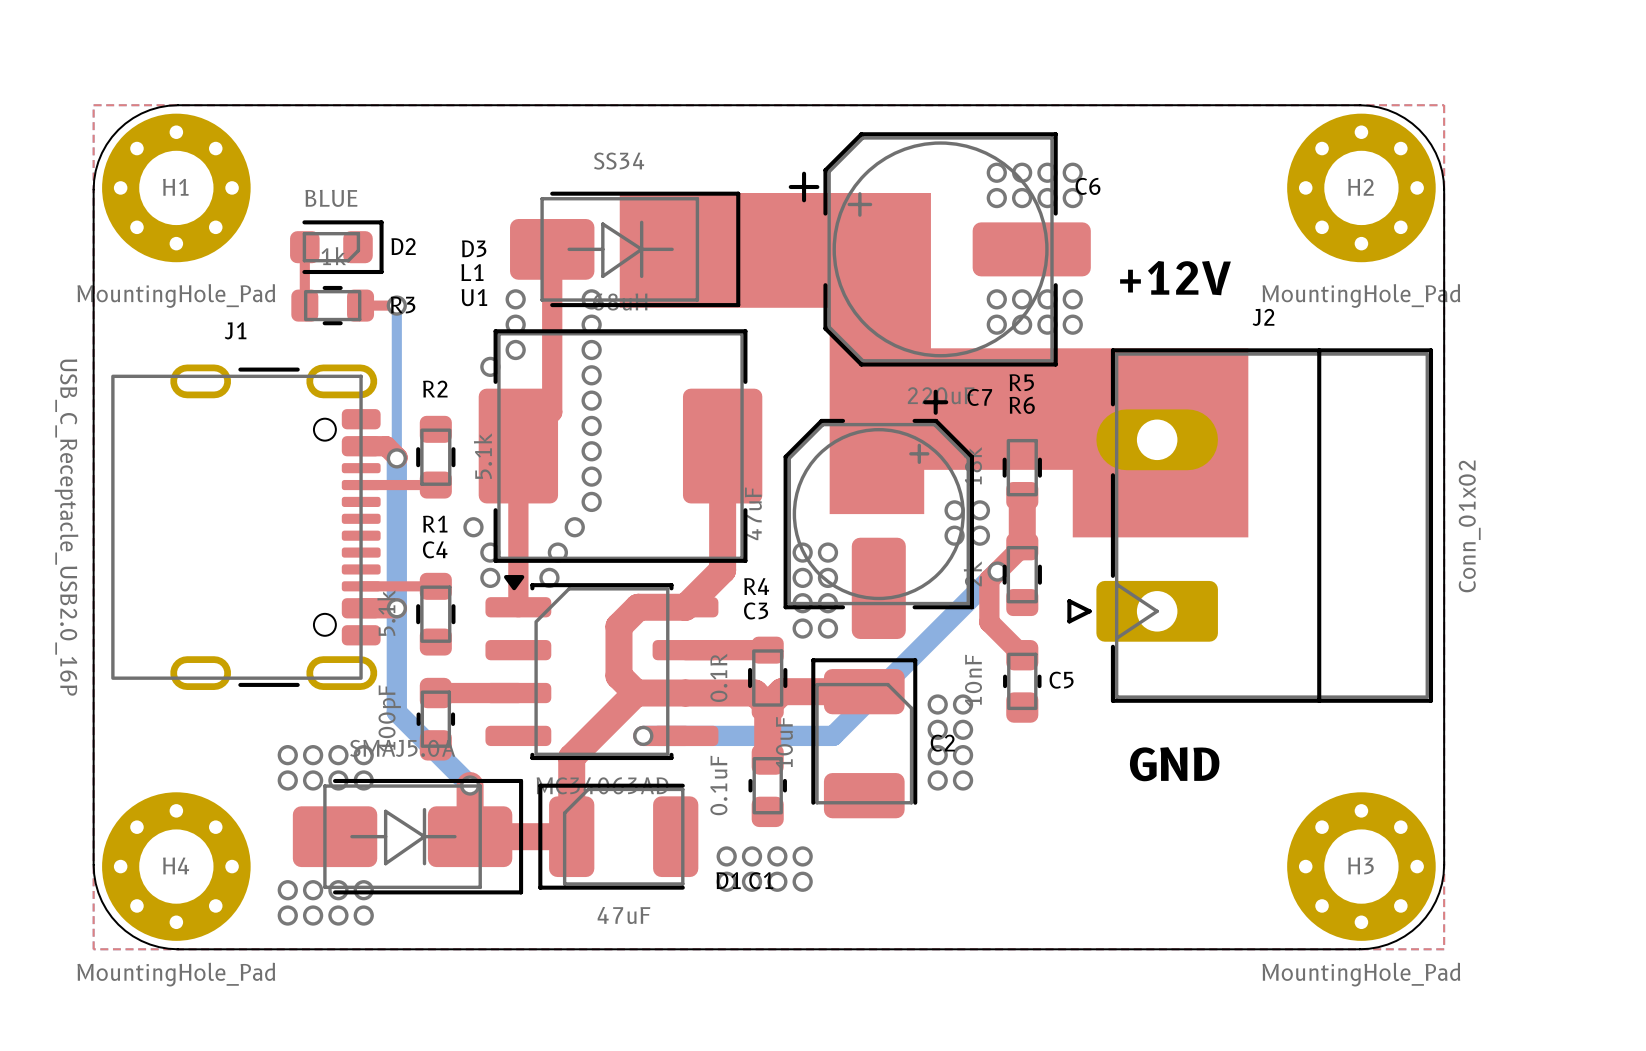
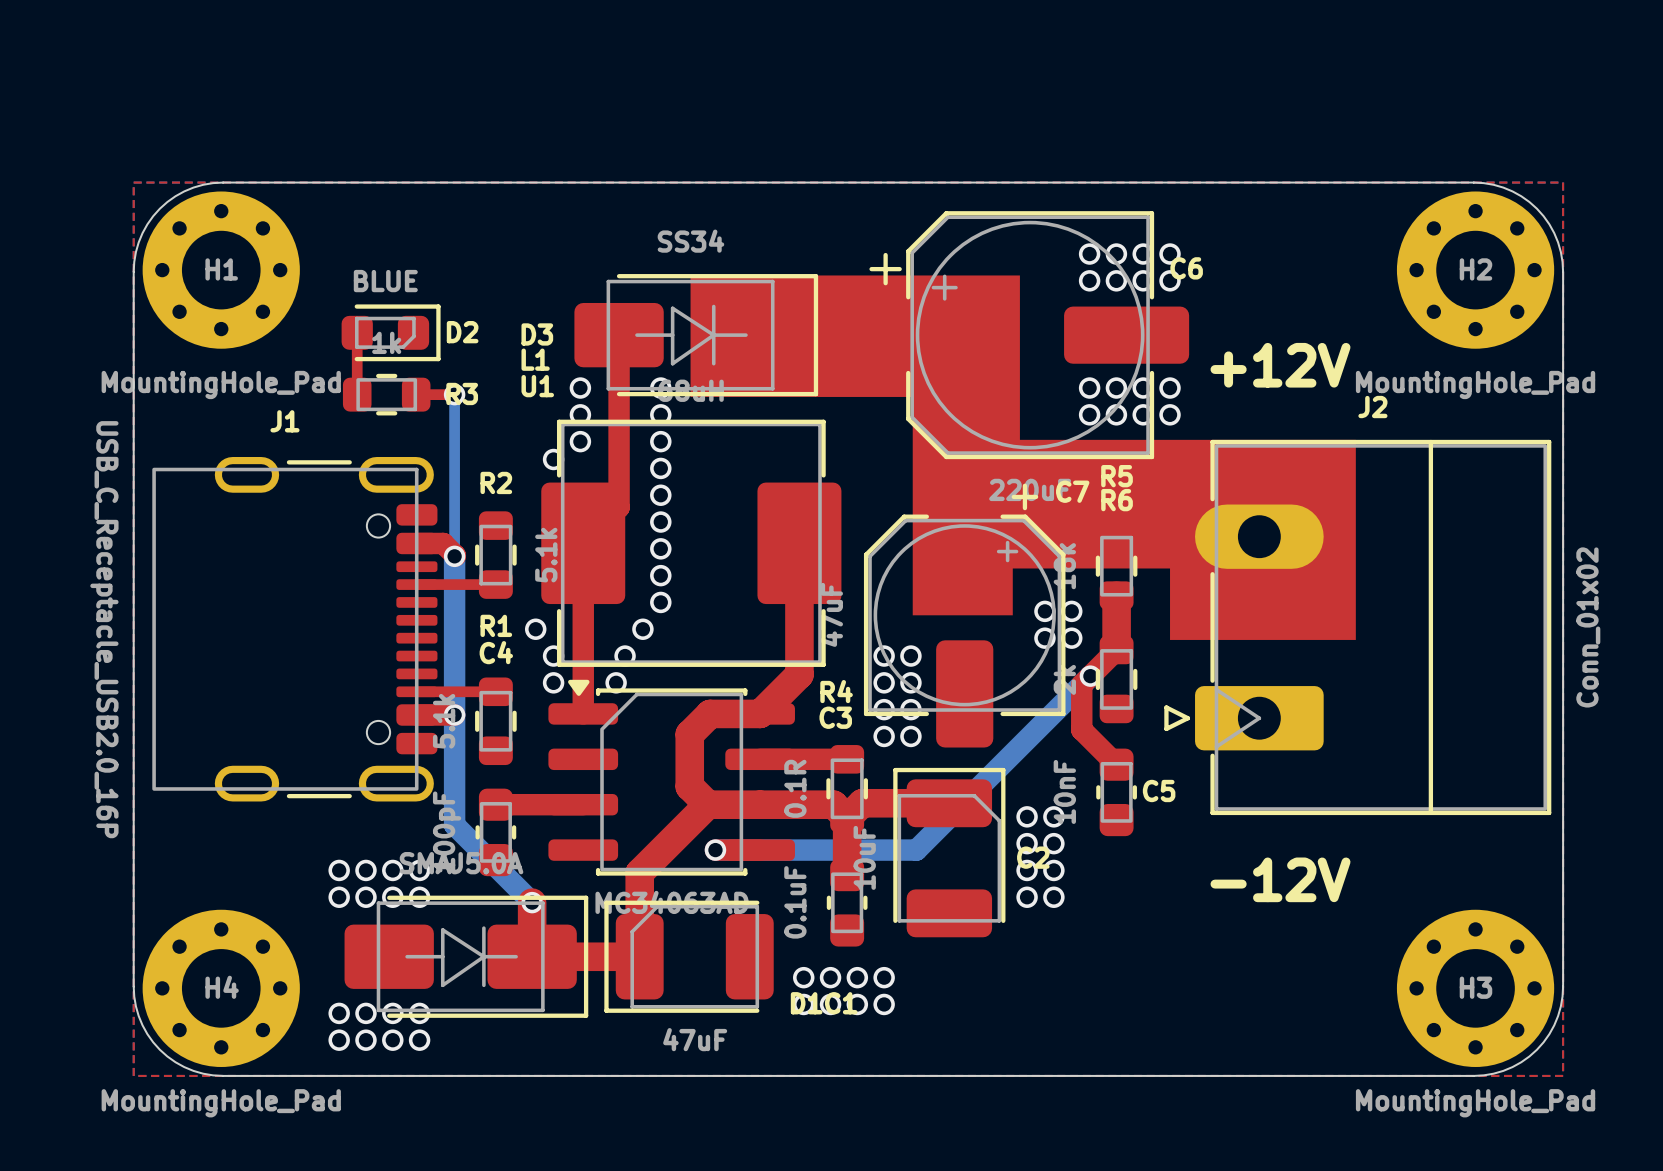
text: GND (1174, 764) -> -12V (1280, 879)

